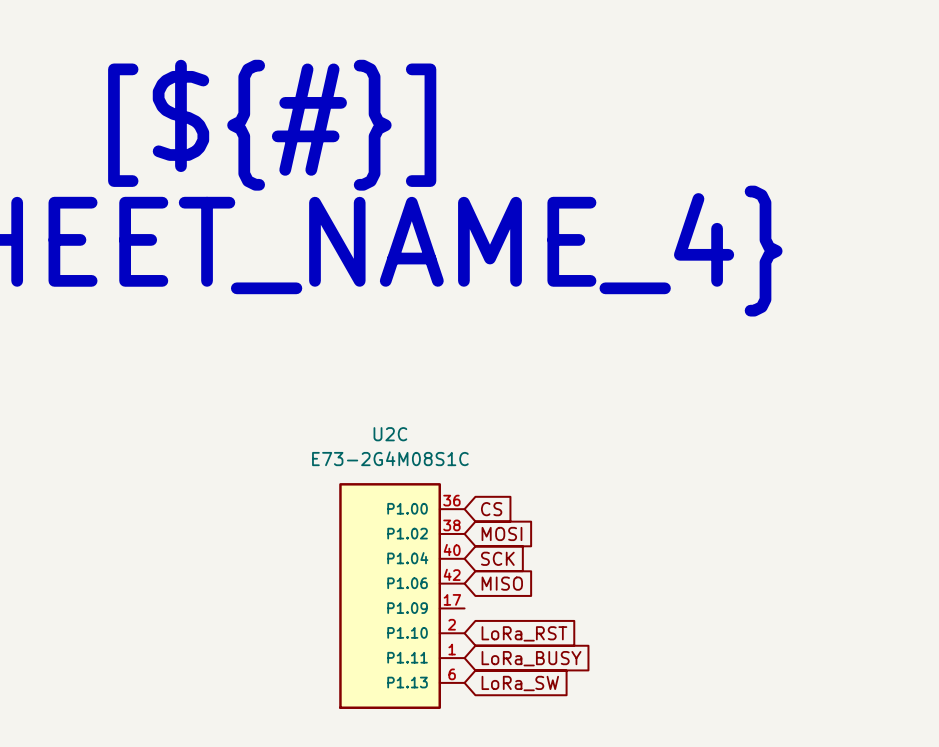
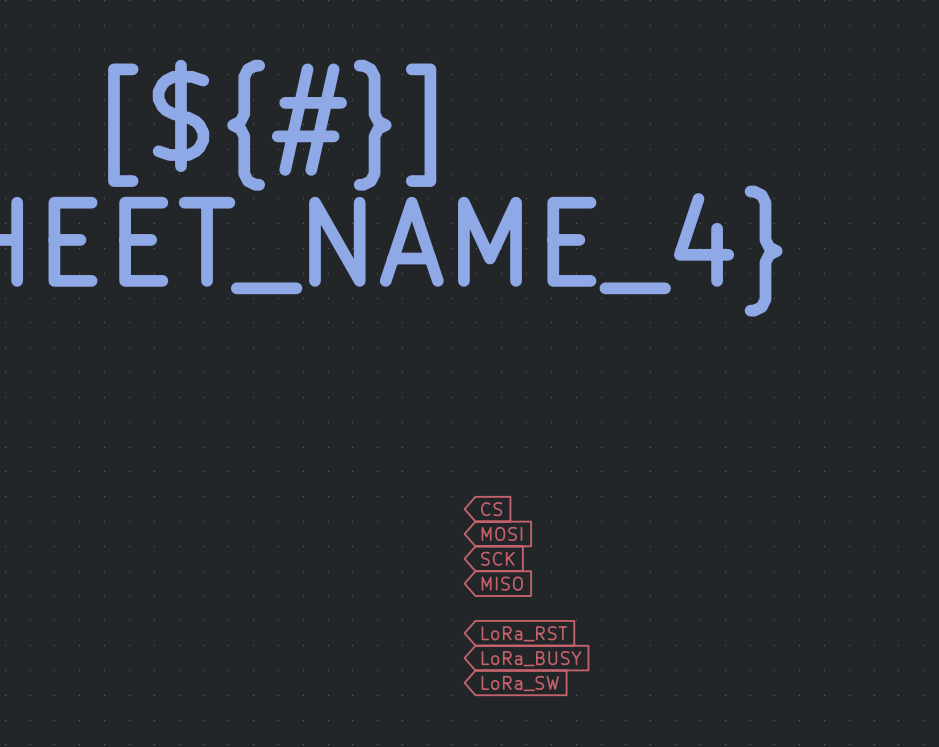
U2C: E73-2G4M08S1C (401, 596) -> none

